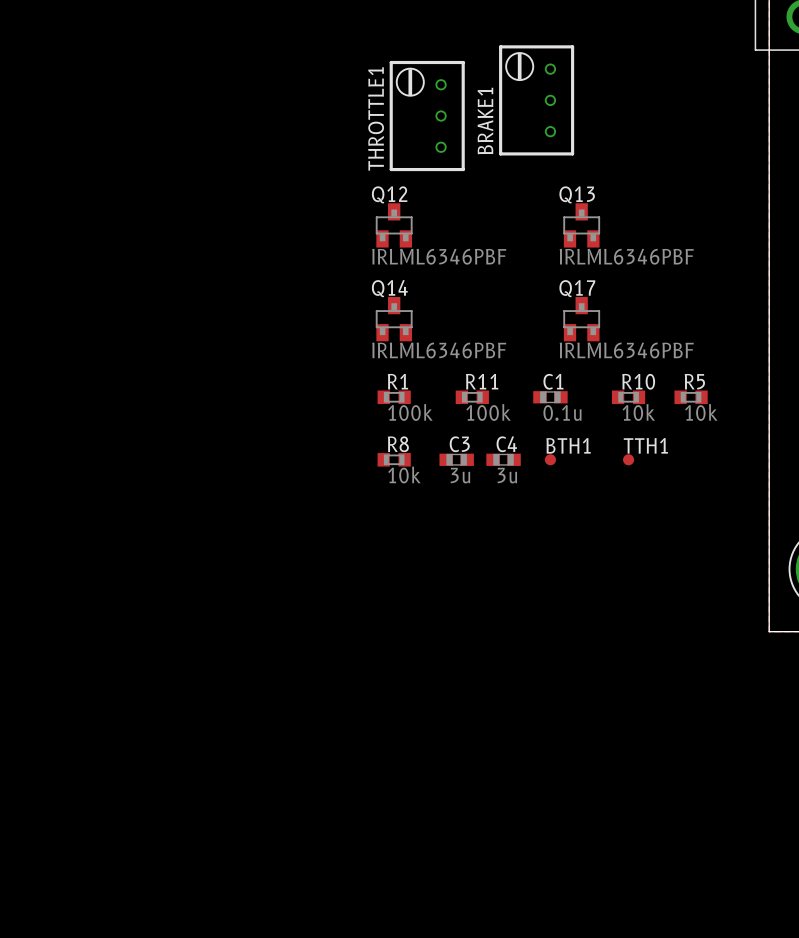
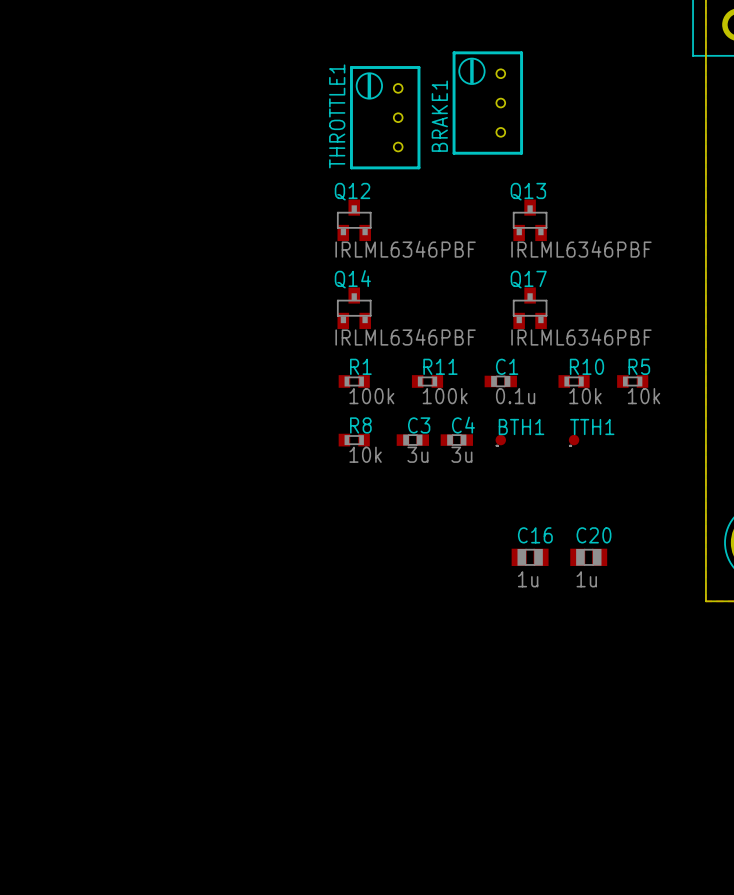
C16: none -> 1u (530, 557)
C20: none -> 1u (588, 557)

